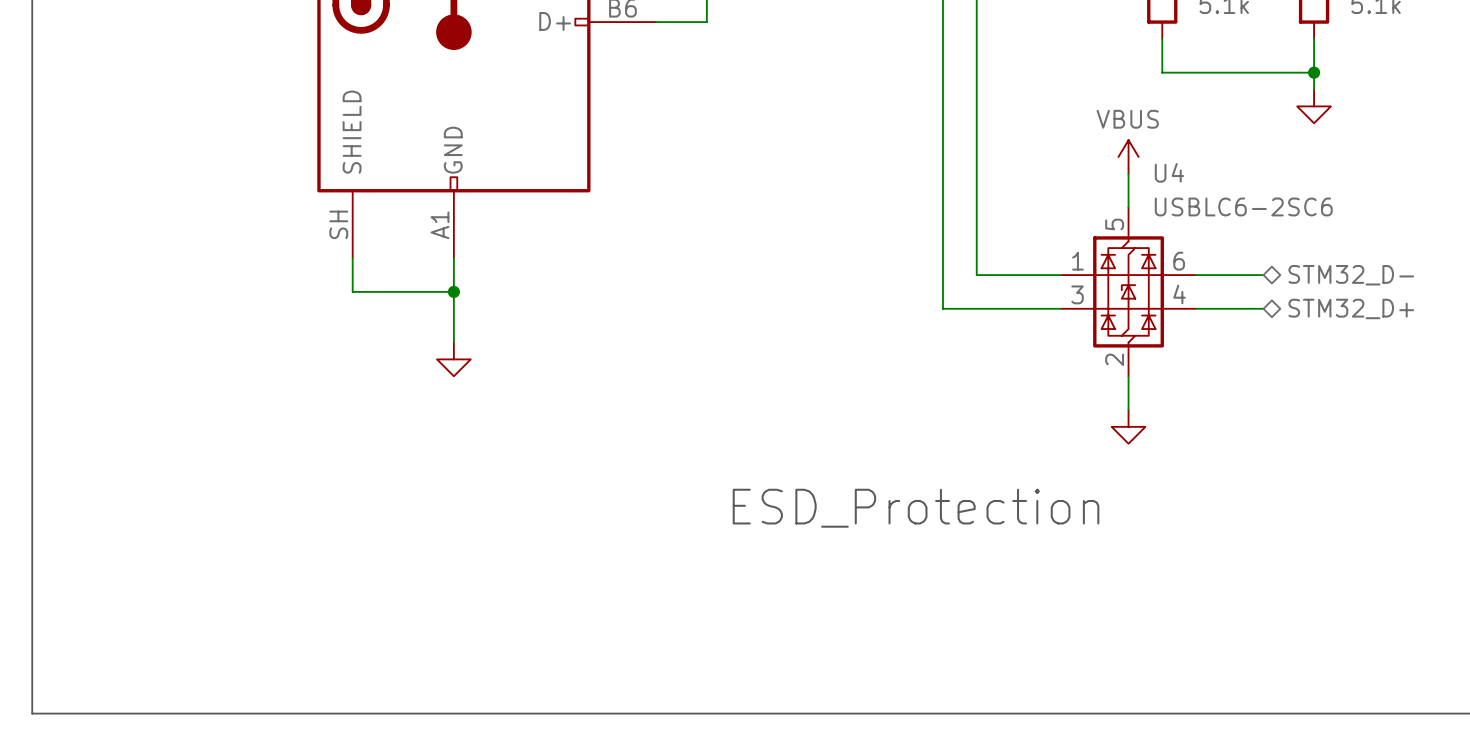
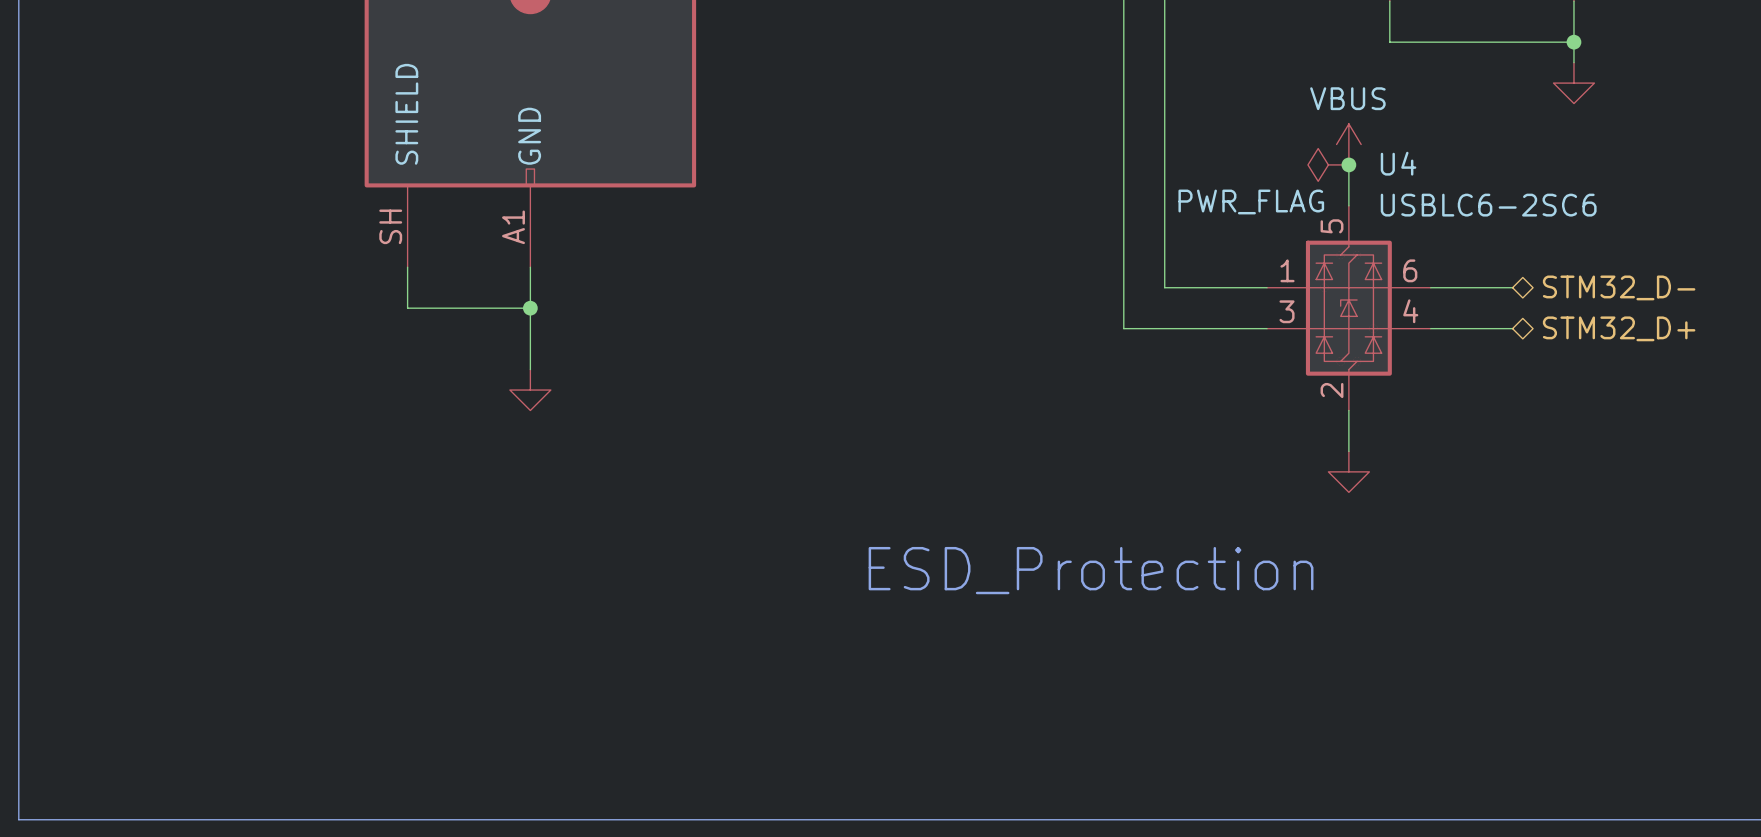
power symbol: none -> PWR_FLAG (1328, 164)
junction: none -> (1348, 164)

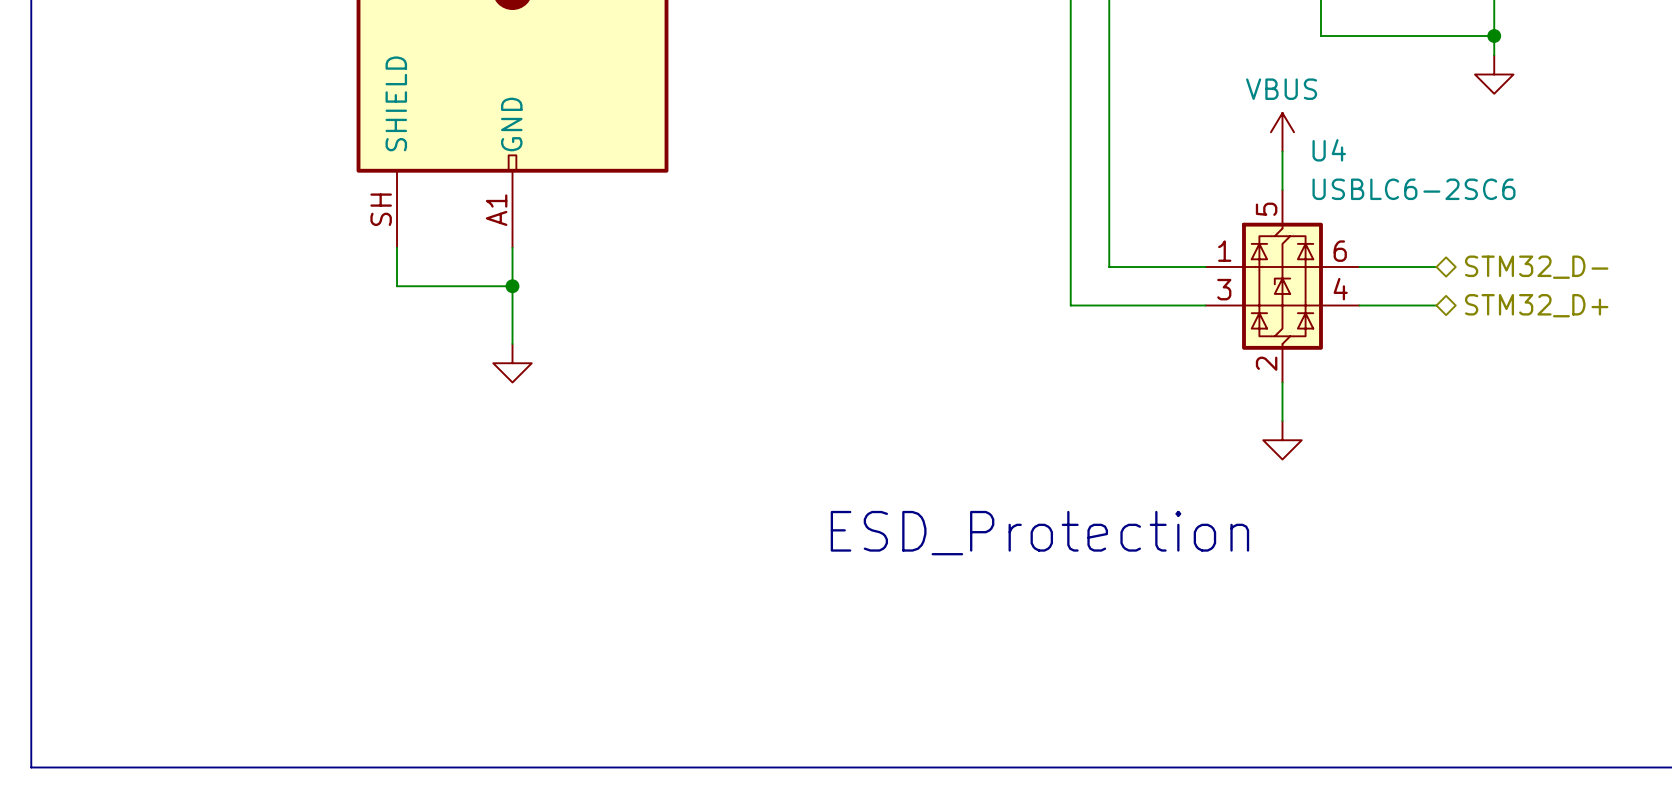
power symbol: PWR_FLAG (1328, 164) -> none
junction: (1348, 164) -> none

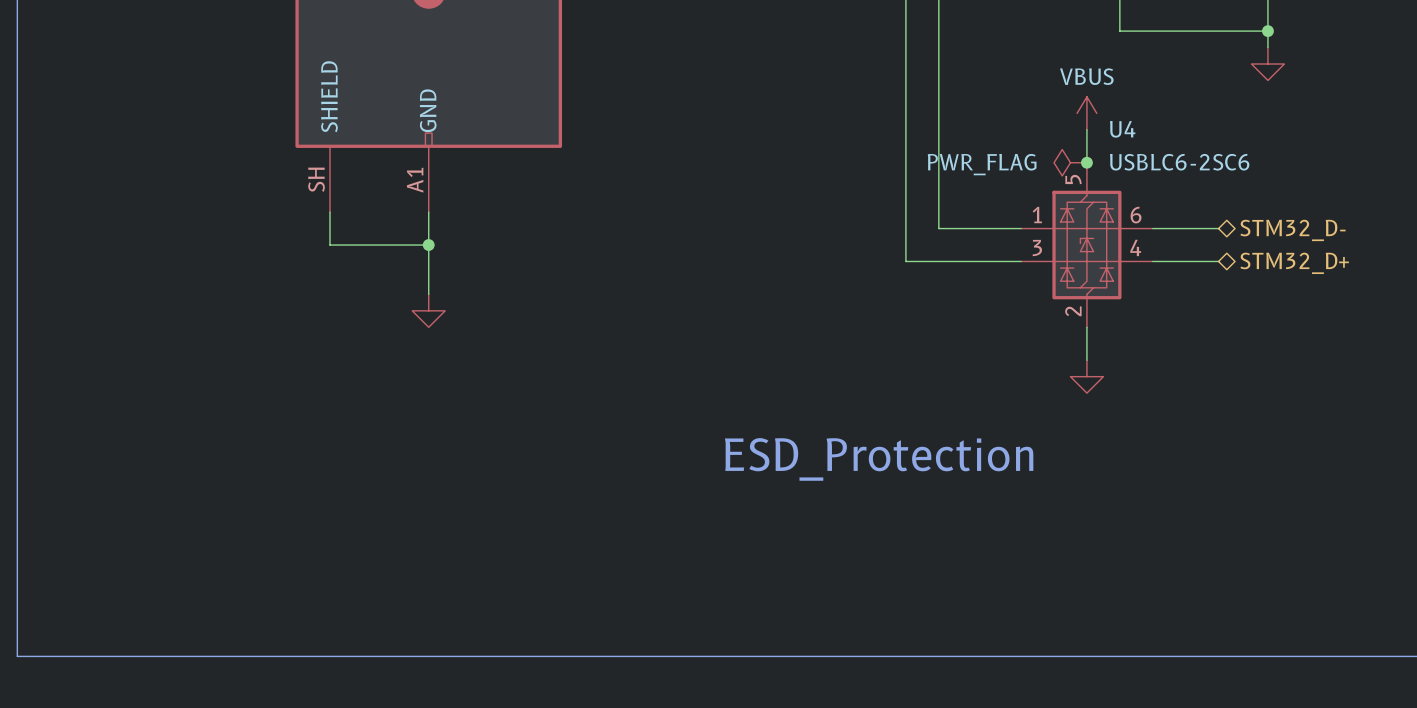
power symbol: none -> PWR_FLAG (1070, 162)
junction: none -> (1086, 162)

